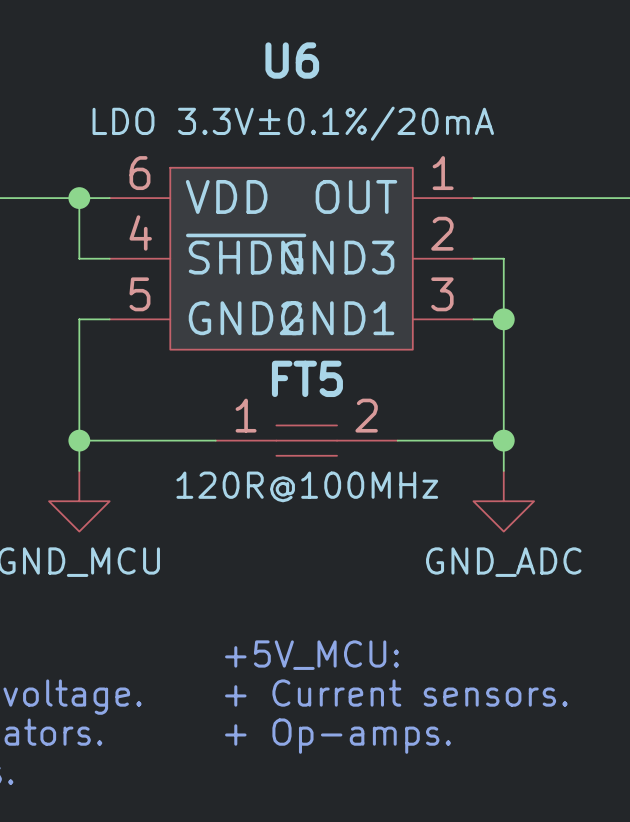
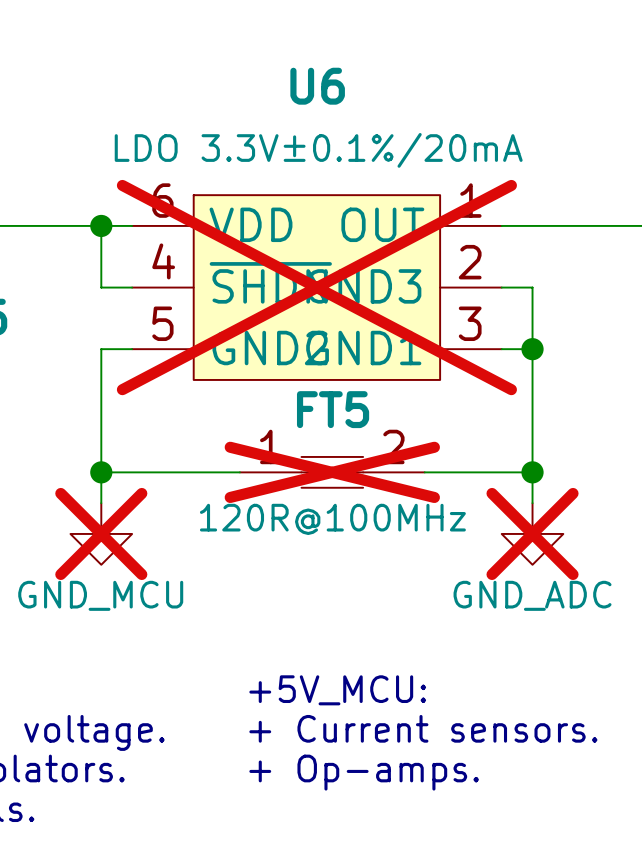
U6 do-not-place cross: none -> (316, 287)
FT5 do-not-place cross: none -> (332, 472)
power symbol do-not-place cross: none -> (101, 533)
power symbol do-not-place cross: none -> (532, 533)

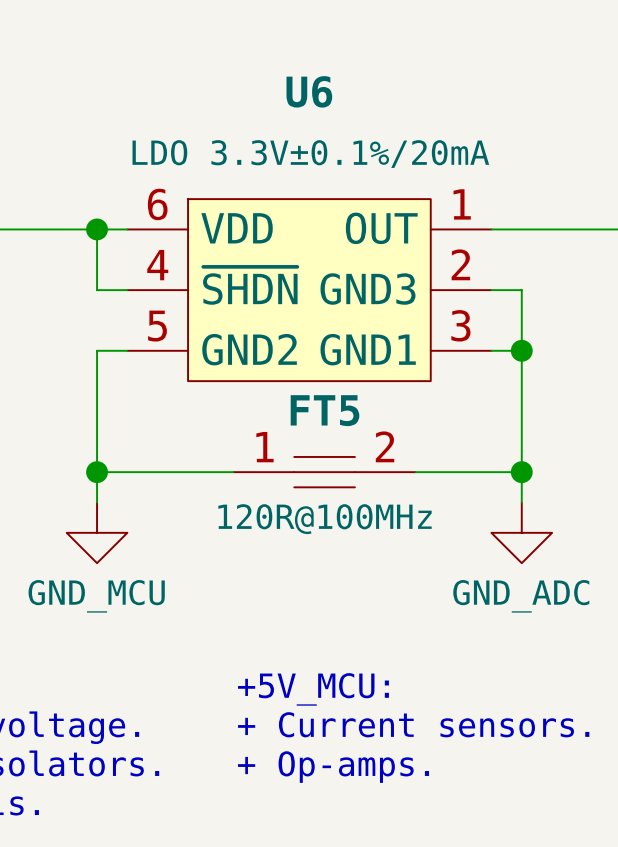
U6 do-not-place cross: (316, 287) -> none
FT5 do-not-place cross: (332, 472) -> none
power symbol do-not-place cross: (101, 533) -> none
power symbol do-not-place cross: (532, 533) -> none

